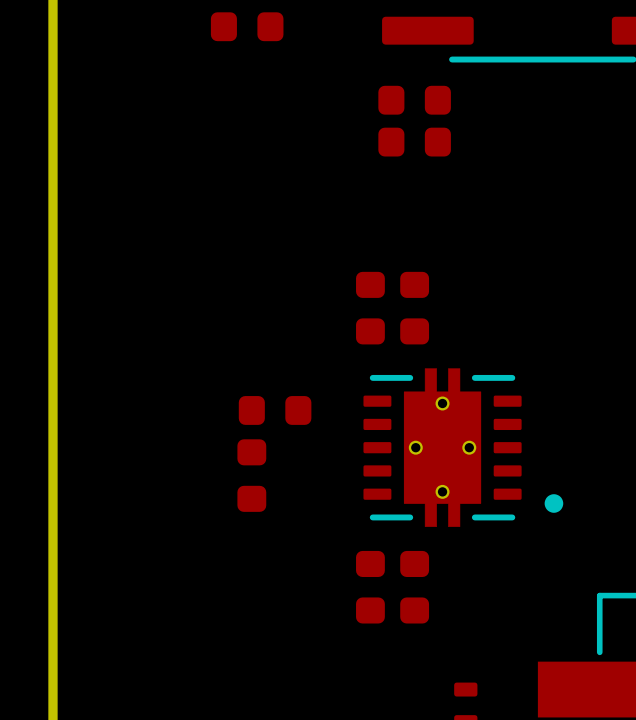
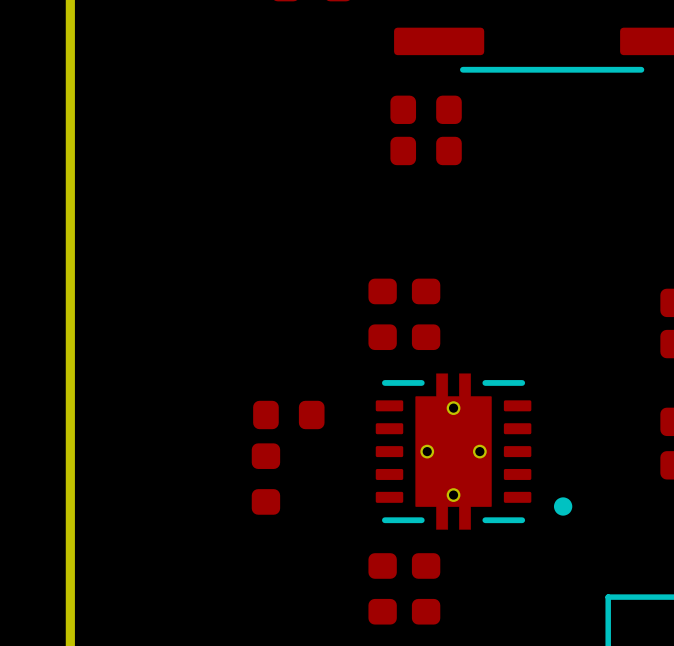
part: (247, 26) -> none

